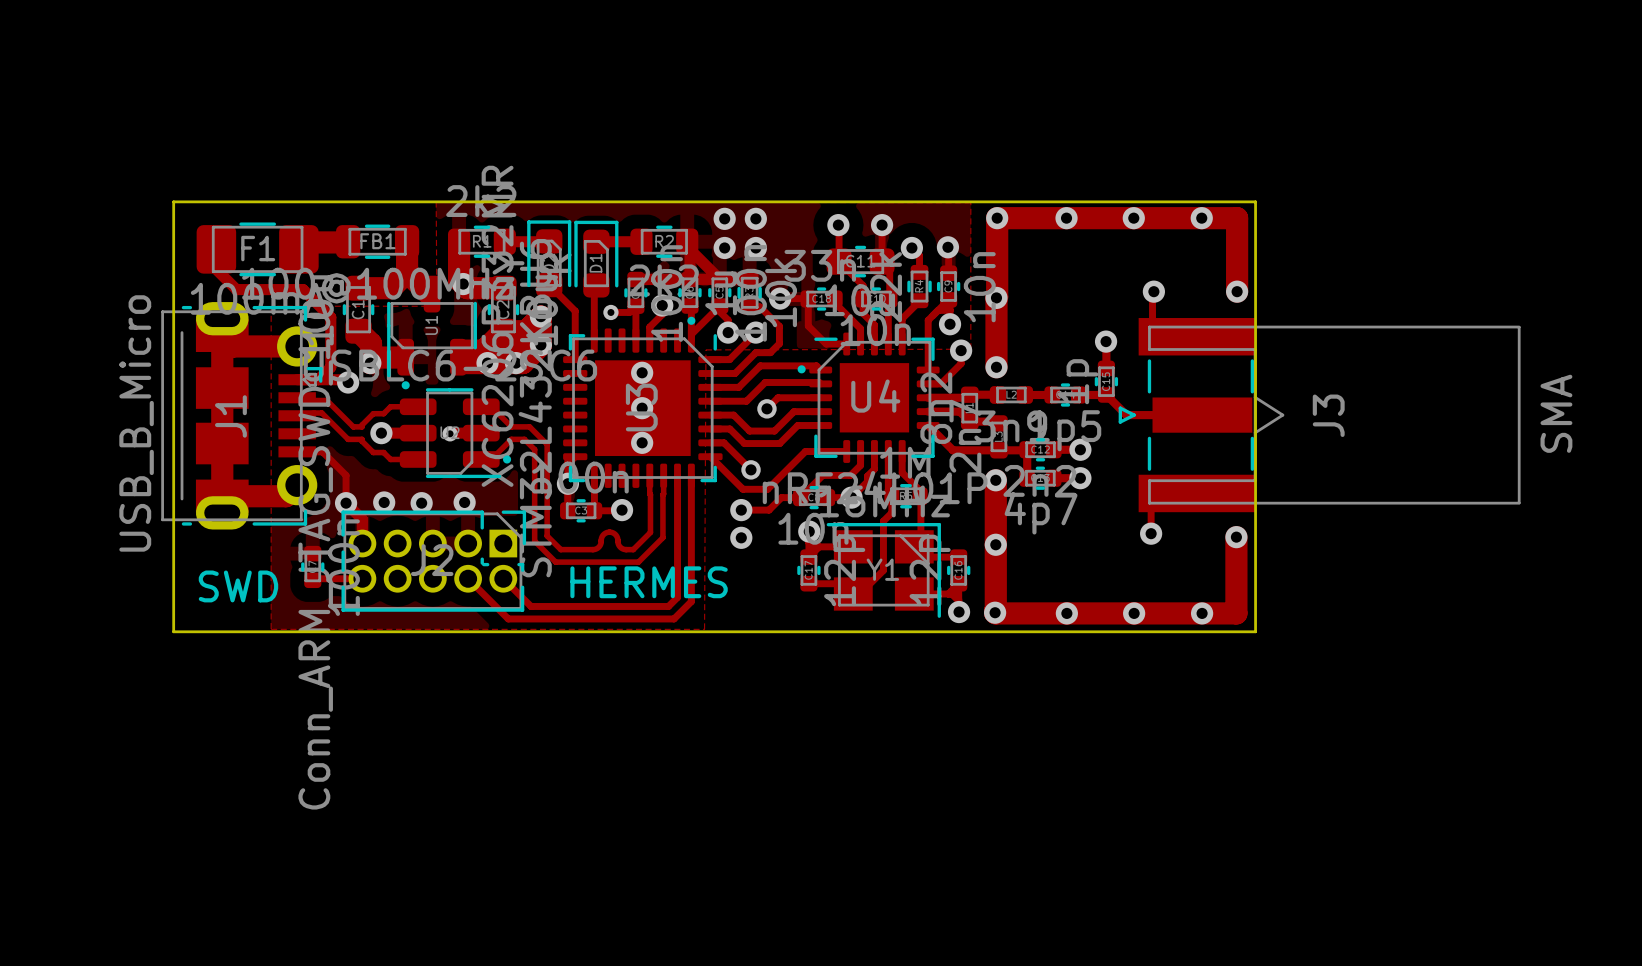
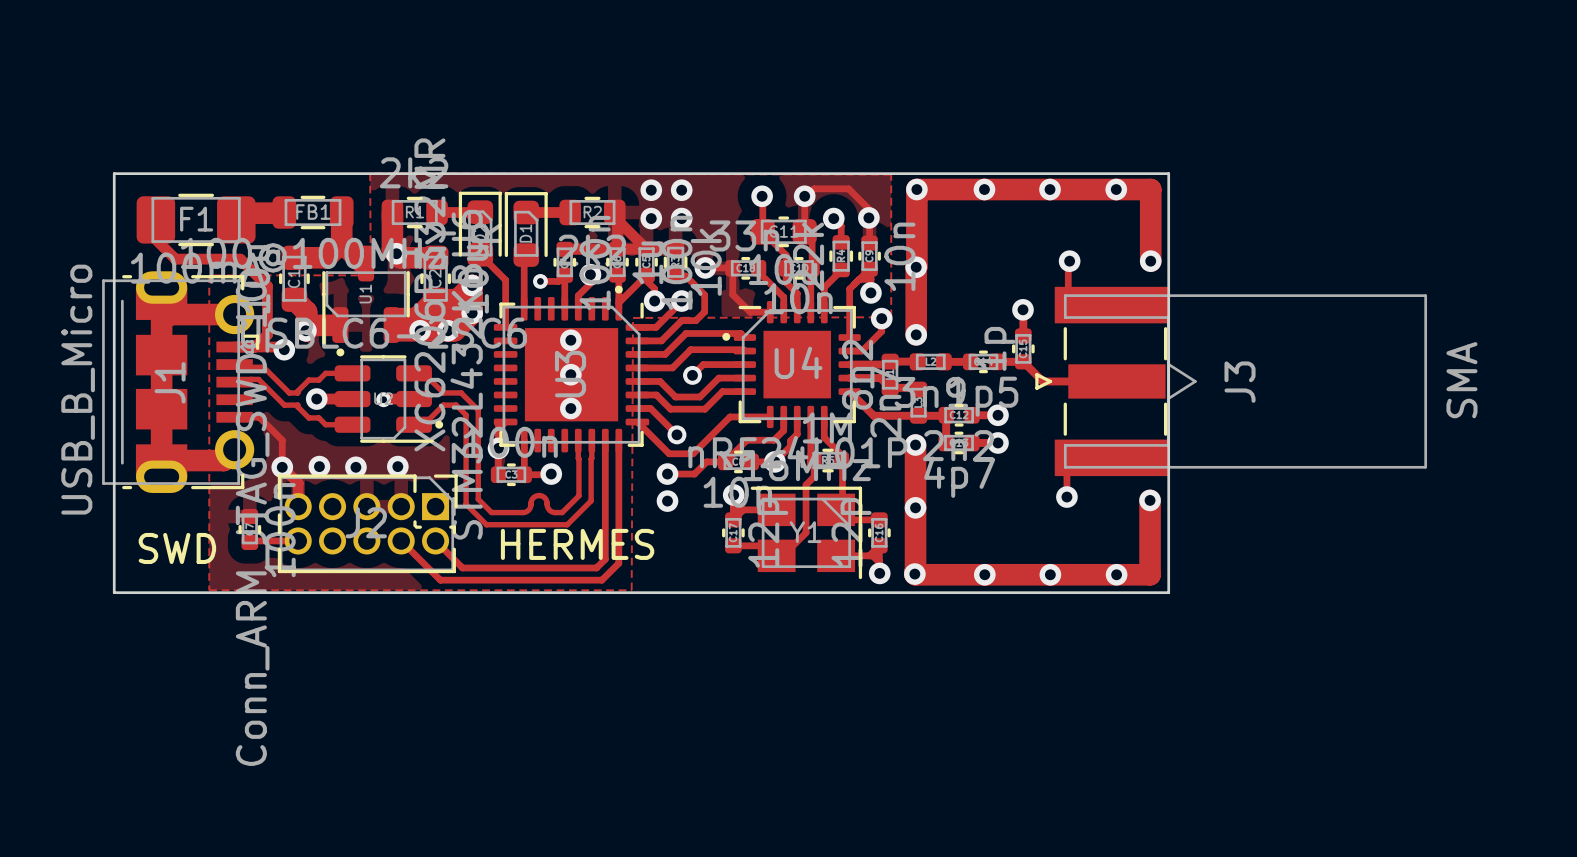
track: none -> (806, 196) (814, 188) (848, 188) (868, 209) (868, 217)

